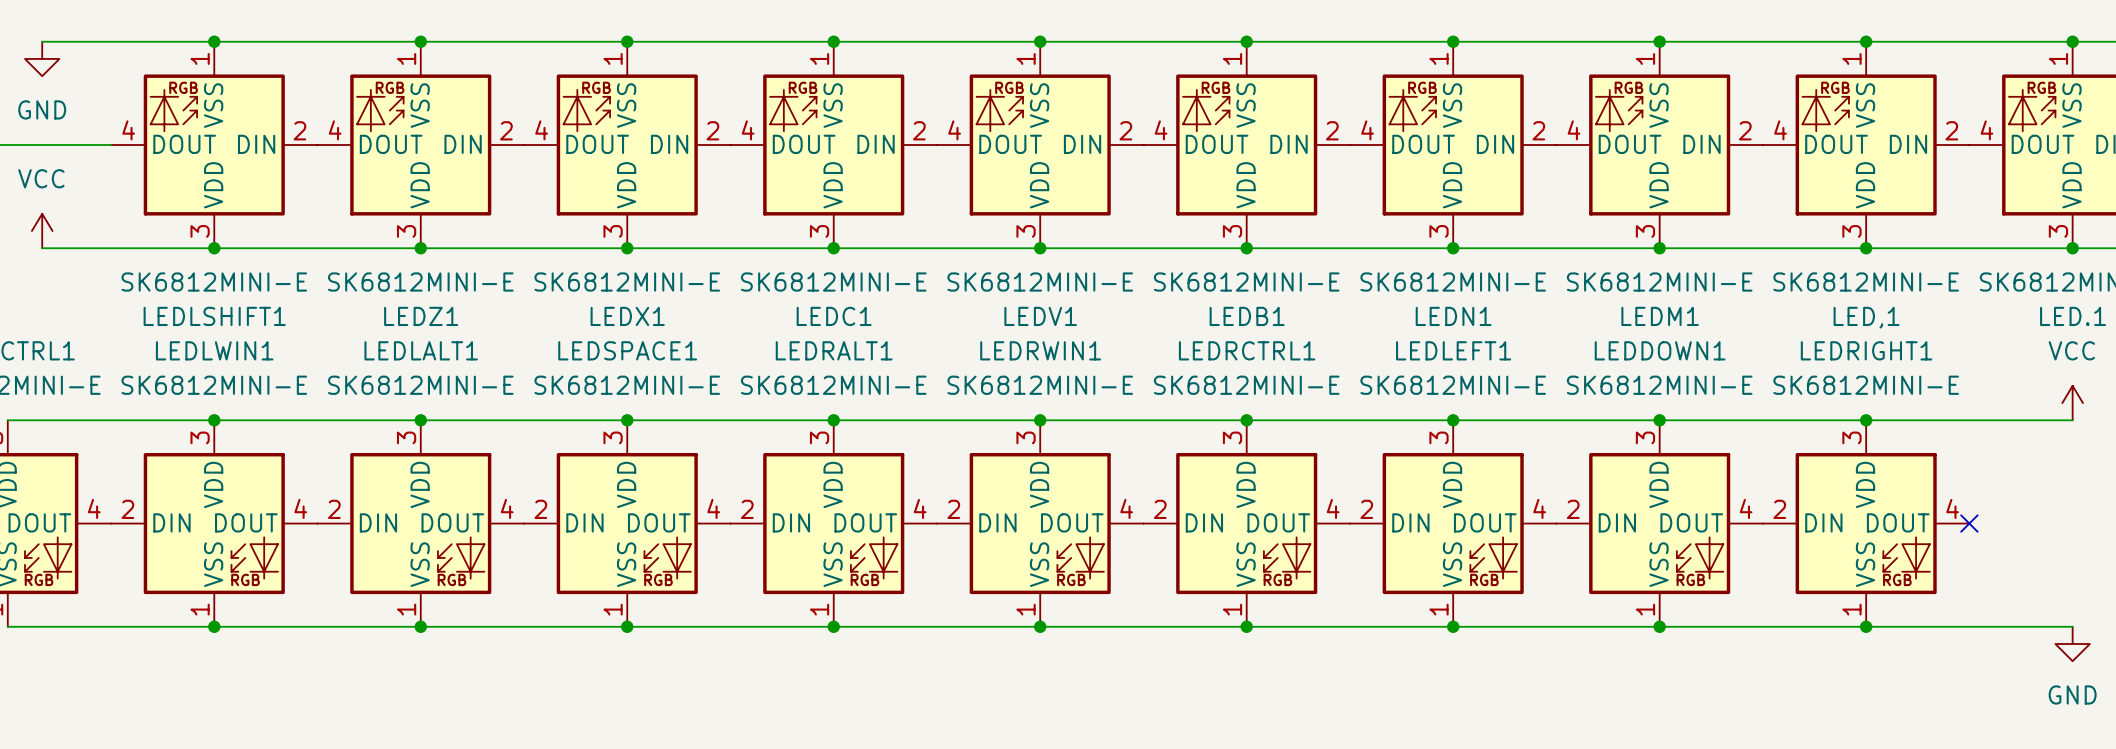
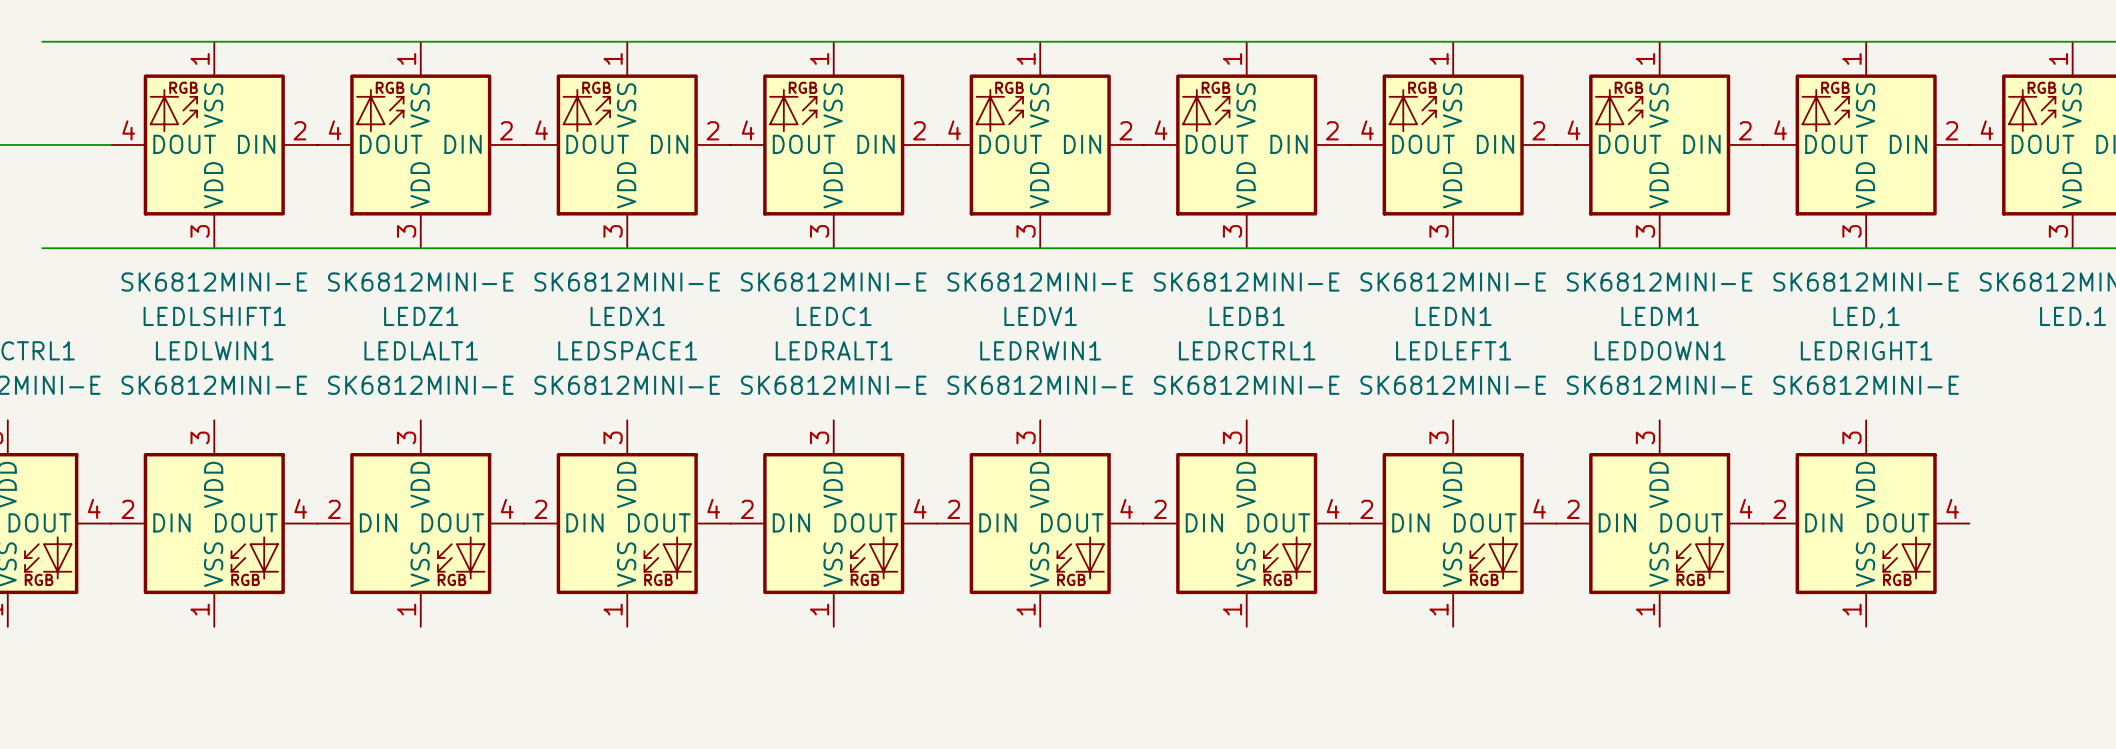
junction: (214, 41) -> none
junction: (420, 41) -> none
junction: (627, 41) -> none
junction: (833, 41) -> none
junction: (1040, 41) -> none
junction: (1246, 41) -> none
junction: (1453, 41) -> none
junction: (1659, 41) -> none
junction: (1866, 41) -> none
junction: (2072, 41) -> none
power symbol: GND (42, 58) -> none
power symbol: VCC (42, 231) -> none
junction: (214, 248) -> none
junction: (420, 248) -> none
junction: (627, 248) -> none
junction: (833, 248) -> none
junction: (1040, 248) -> none
junction: (1246, 248) -> none
junction: (1453, 248) -> none
junction: (1659, 248) -> none
junction: (1866, 248) -> none
junction: (2072, 248) -> none
power symbol: VCC (2072, 403) -> none
wire: (7, 420) (2072, 420) -> none
junction: (214, 420) -> none
junction: (420, 420) -> none
junction: (627, 420) -> none
junction: (833, 420) -> none
junction: (1040, 420) -> none
junction: (1246, 420) -> none
junction: (1453, 420) -> none
junction: (1659, 420) -> none
junction: (1866, 420) -> none
no-connect mark: (1969, 523) -> none
wire: (7, 626) (2072, 626) -> none
junction: (214, 626) -> none
junction: (420, 626) -> none
junction: (627, 626) -> none
junction: (833, 626) -> none
junction: (1040, 626) -> none
junction: (1246, 626) -> none
junction: (1453, 626) -> none
junction: (1659, 626) -> none
junction: (1866, 626) -> none
power symbol: GND (2072, 643) -> none

